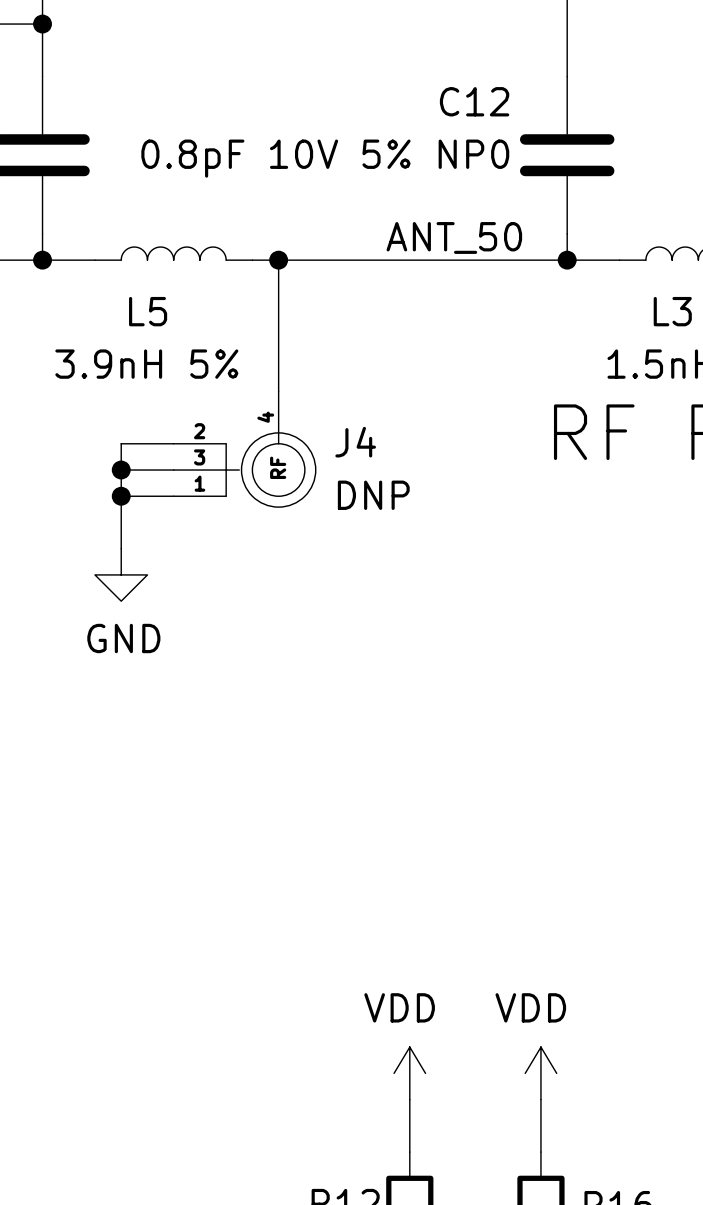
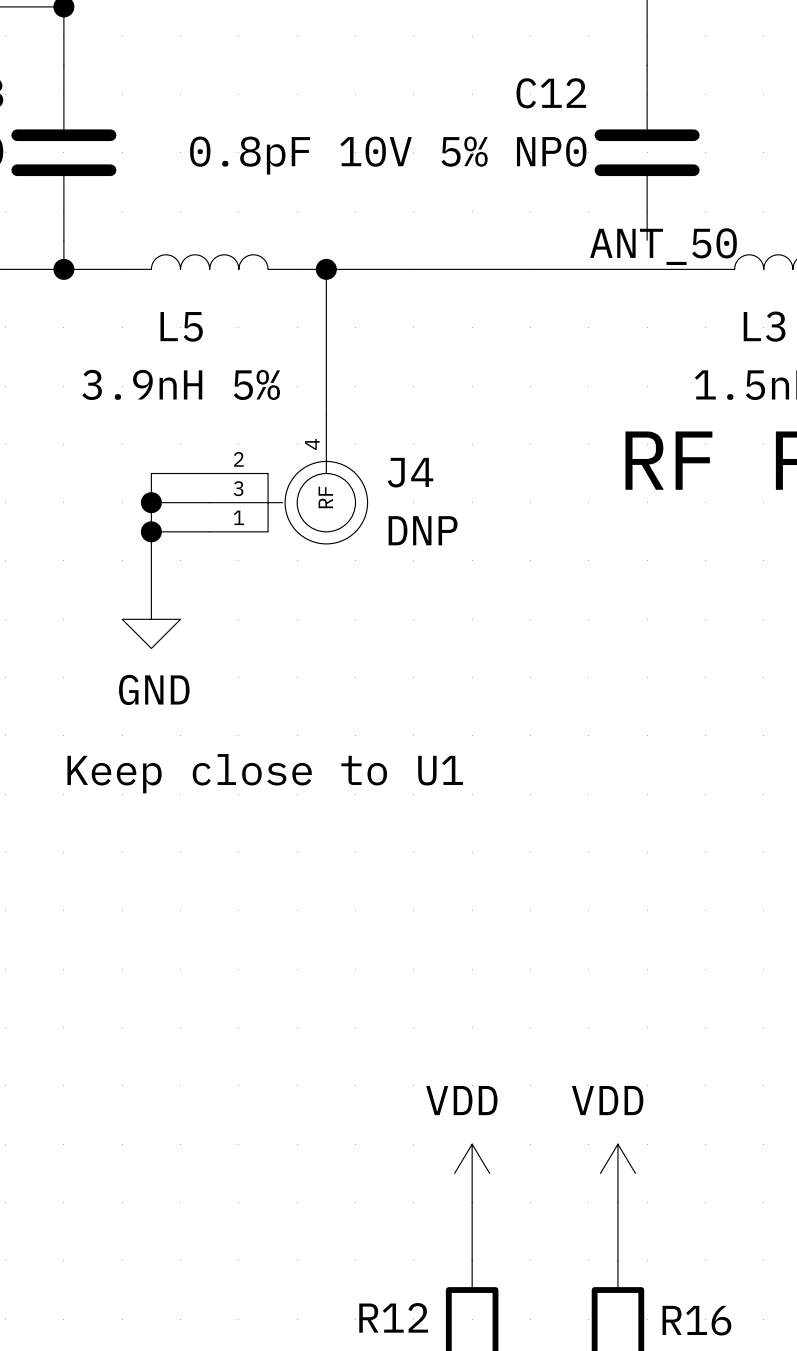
wire: (567, 233) (567, 260) -> none
label position: ANT_50 (454, 237) -> ANT_50 (663, 246)
junction: (567, 260) -> none
text: none -> Keep close to U1 (265, 773)

